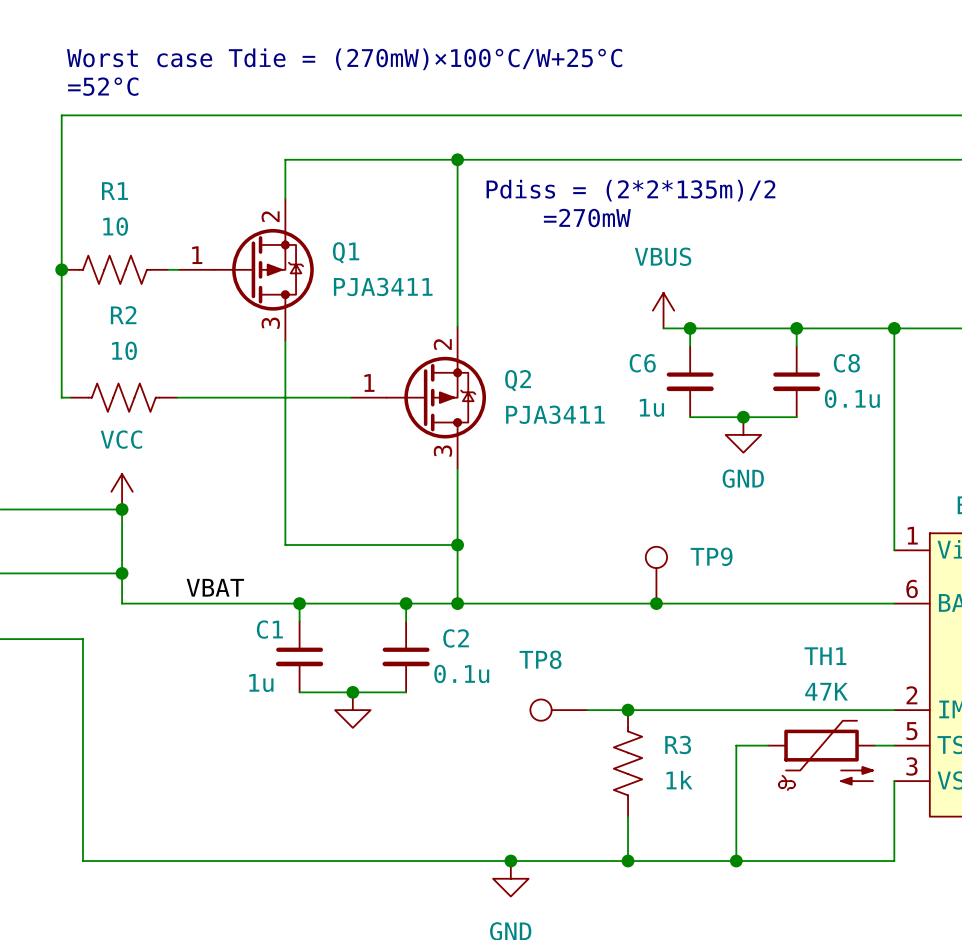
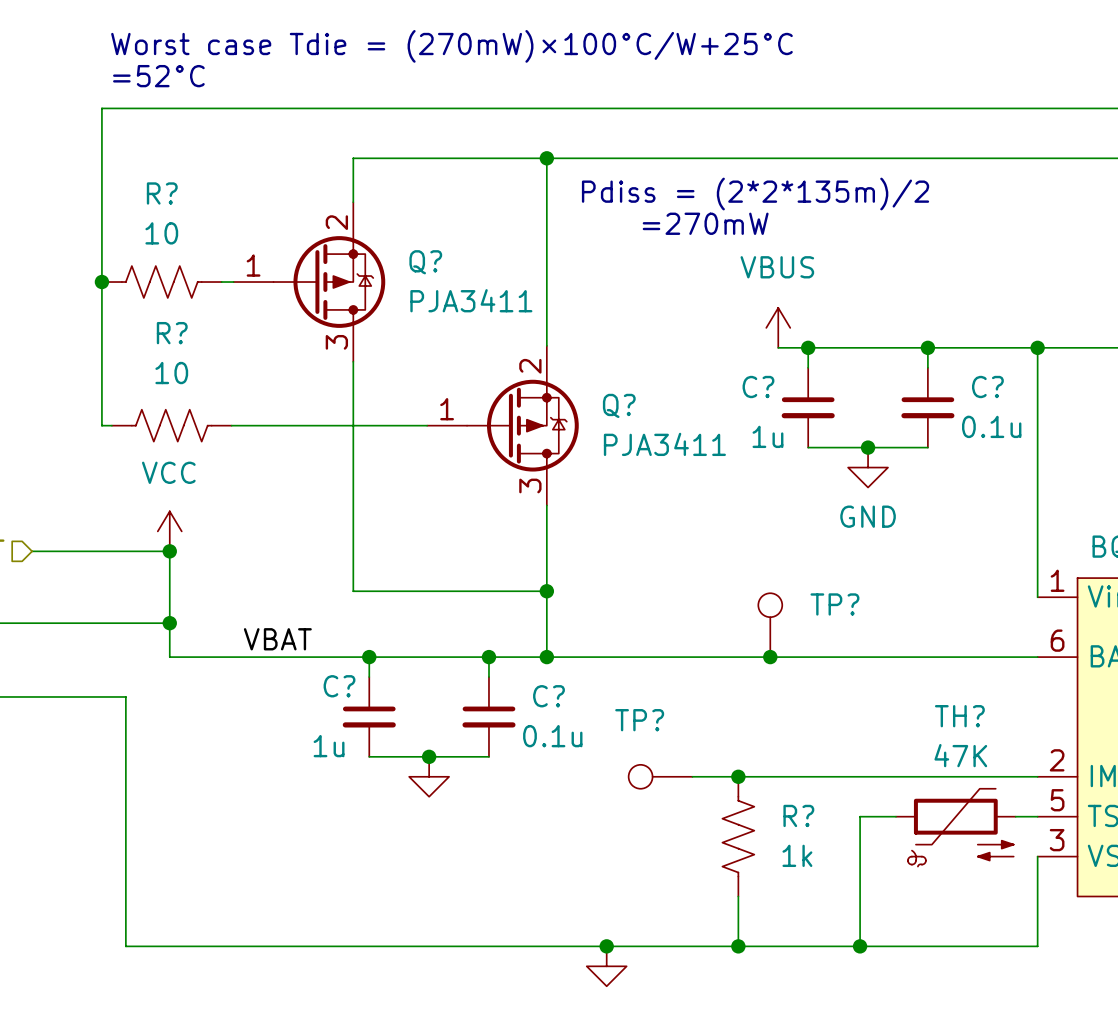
R1 name: R1 (114, 191) -> R? (162, 193)
Q1 name: Q1 (346, 252) -> Q? (425, 262)
R2 name: R2 (123, 315) -> R? (172, 333)
C6 name: C6 (642, 363) -> C? (758, 387)
C8 name: C8 (846, 363) -> C? (987, 387)
Q2 name: Q2 (518, 380) -> Q? (619, 405)
TP9 name: TP9 (711, 556) -> TP? (834, 604)
C1 name: C1 (269, 629) -> C? (339, 686)
C2 name: C2 (456, 638) -> C? (548, 696)
TH1 name: TH1 (825, 656) -> TH? (959, 716)
TP8 name: TP8 (540, 659) -> TP? (639, 720)
R3 name: R3 (678, 744) -> R? (798, 815)

